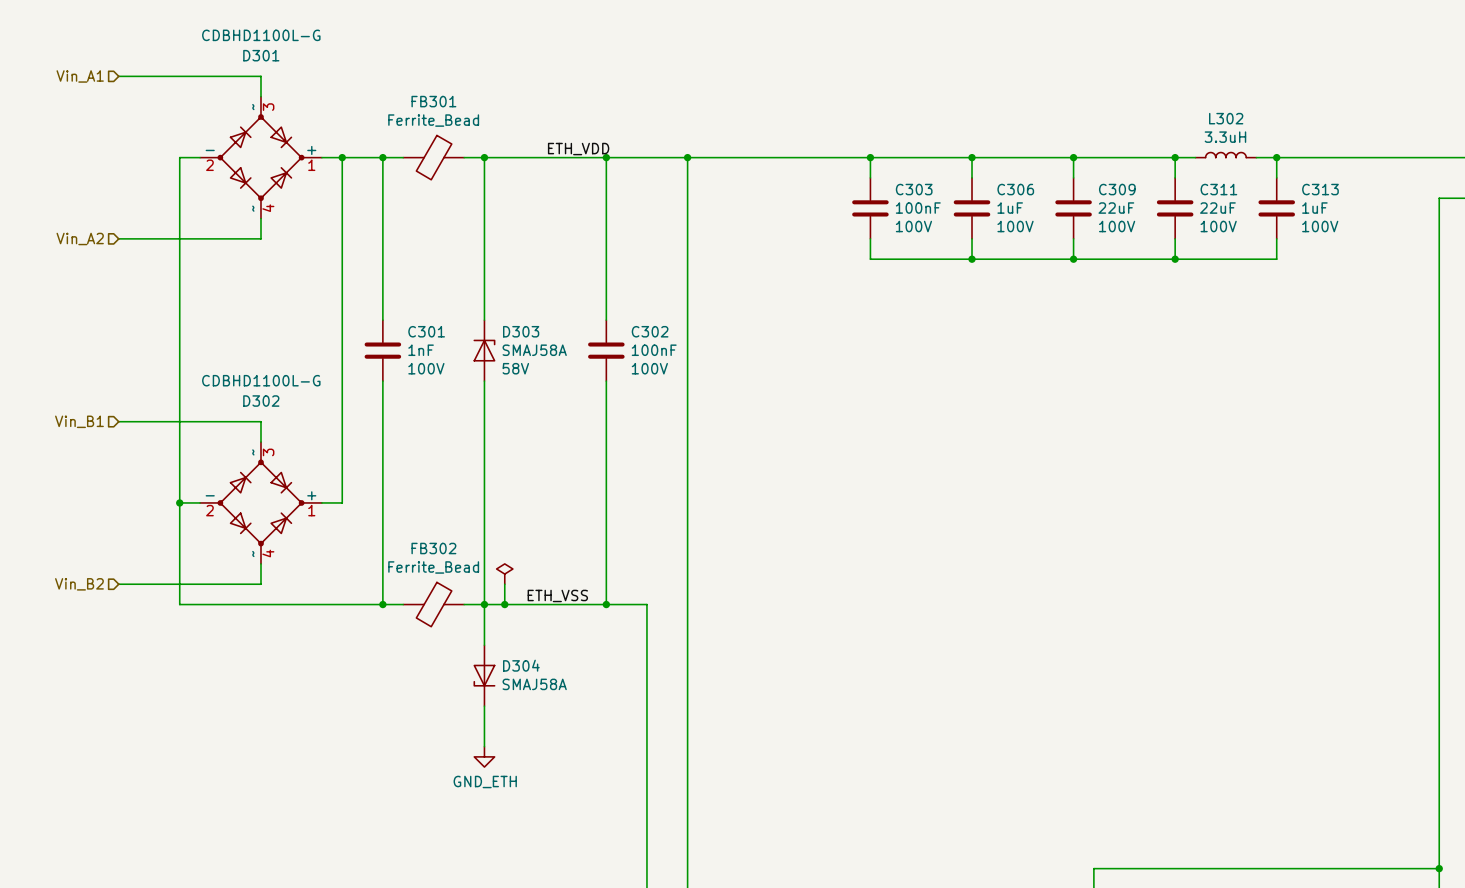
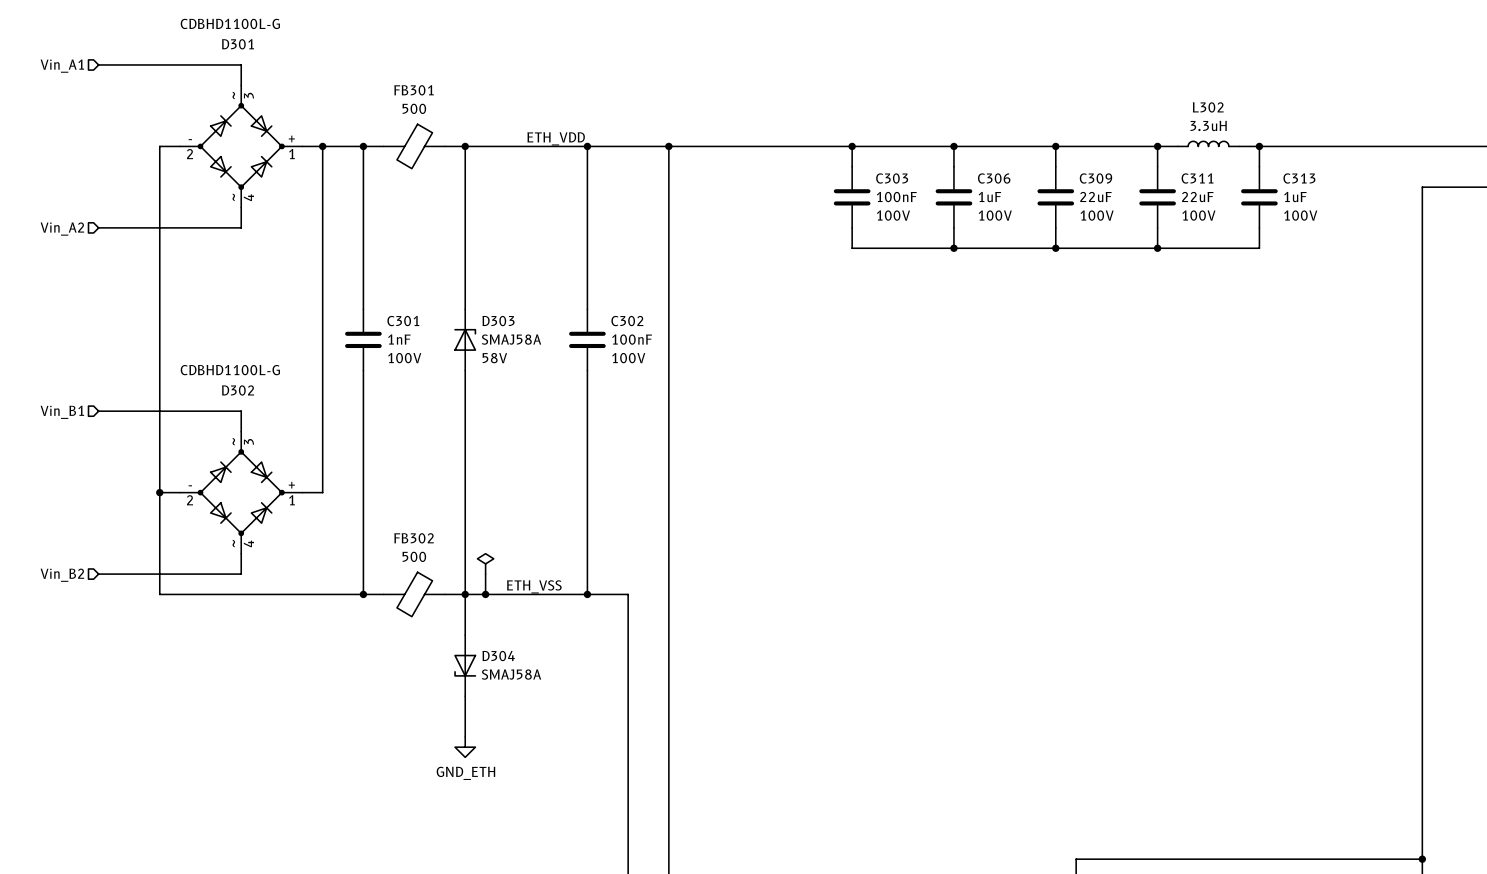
FB301 value: Ferrite_Bead (433, 120) -> 500 (414, 108)
FB302 value: Ferrite_Bead (433, 567) -> 500 (414, 556)

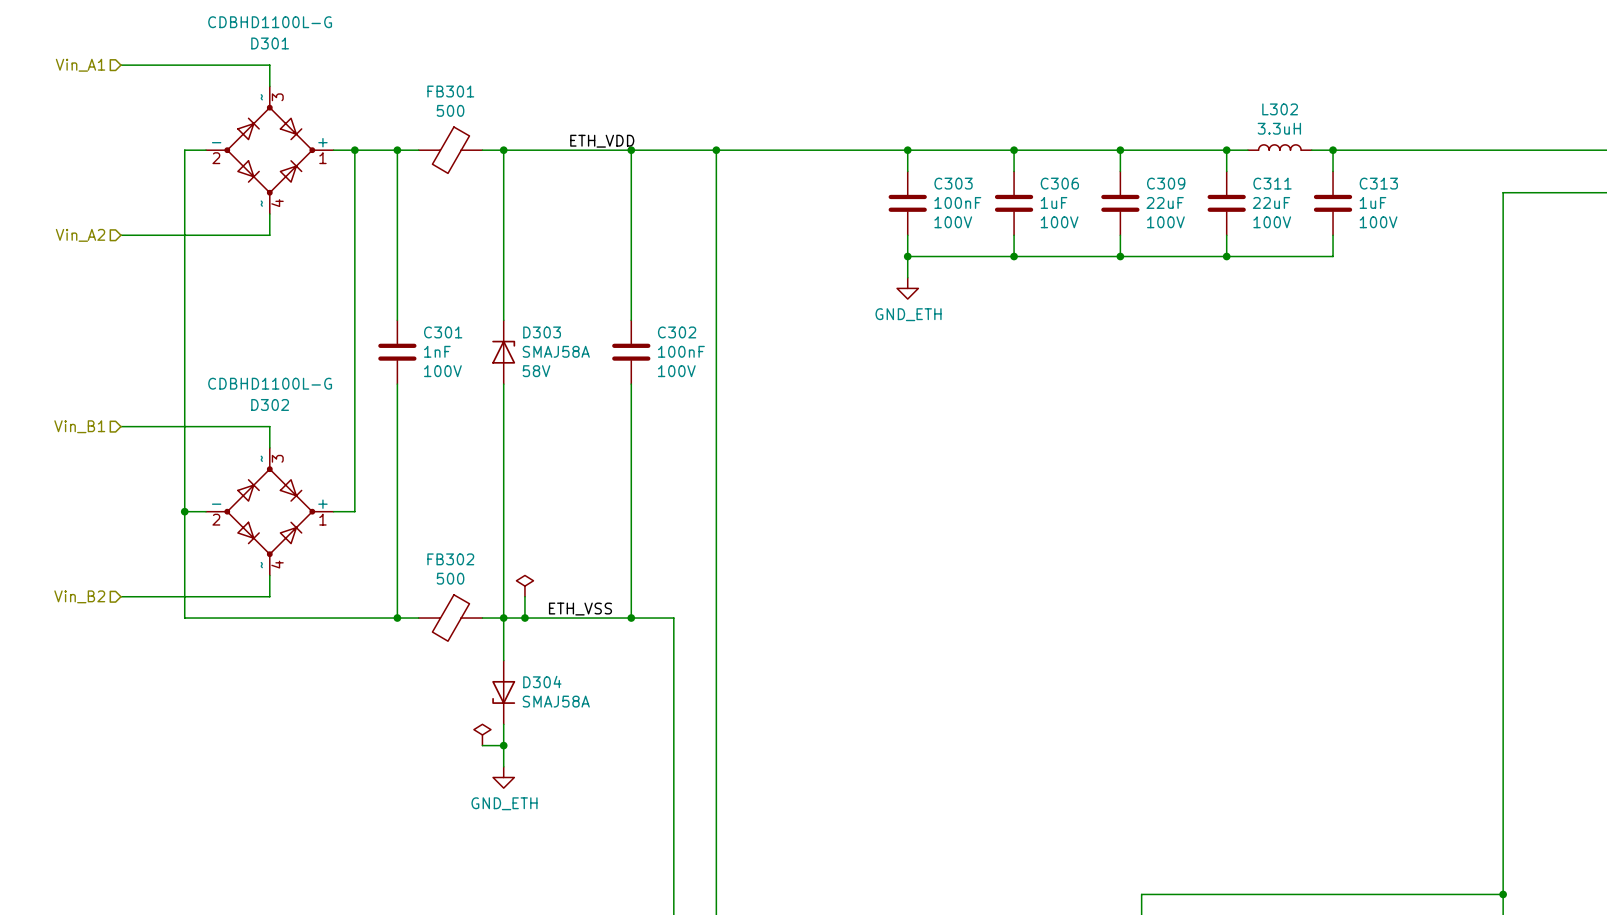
wire: none -> (907, 256) (907, 277)
junction: none -> (907, 256)
power symbol: none -> GND_ETH (907, 288)
power symbol: none -> (482, 734)
wire: none -> (482, 745) (503, 745)
junction: none -> (503, 745)

